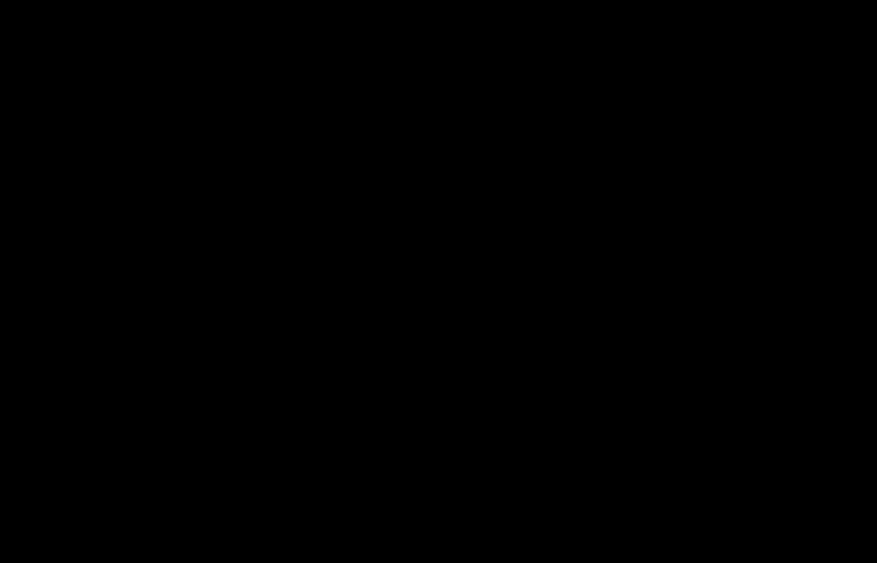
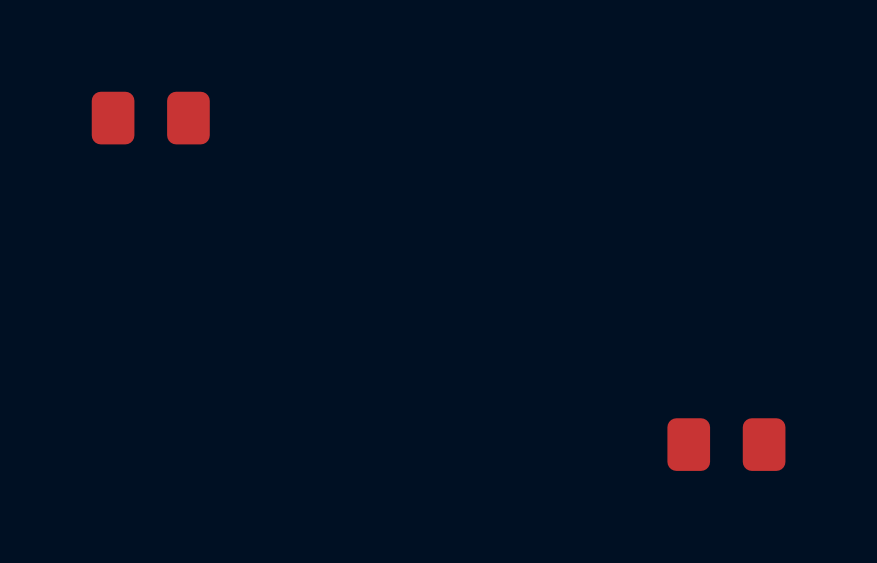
part: none -> (150, 118)
part: none -> (726, 444)

